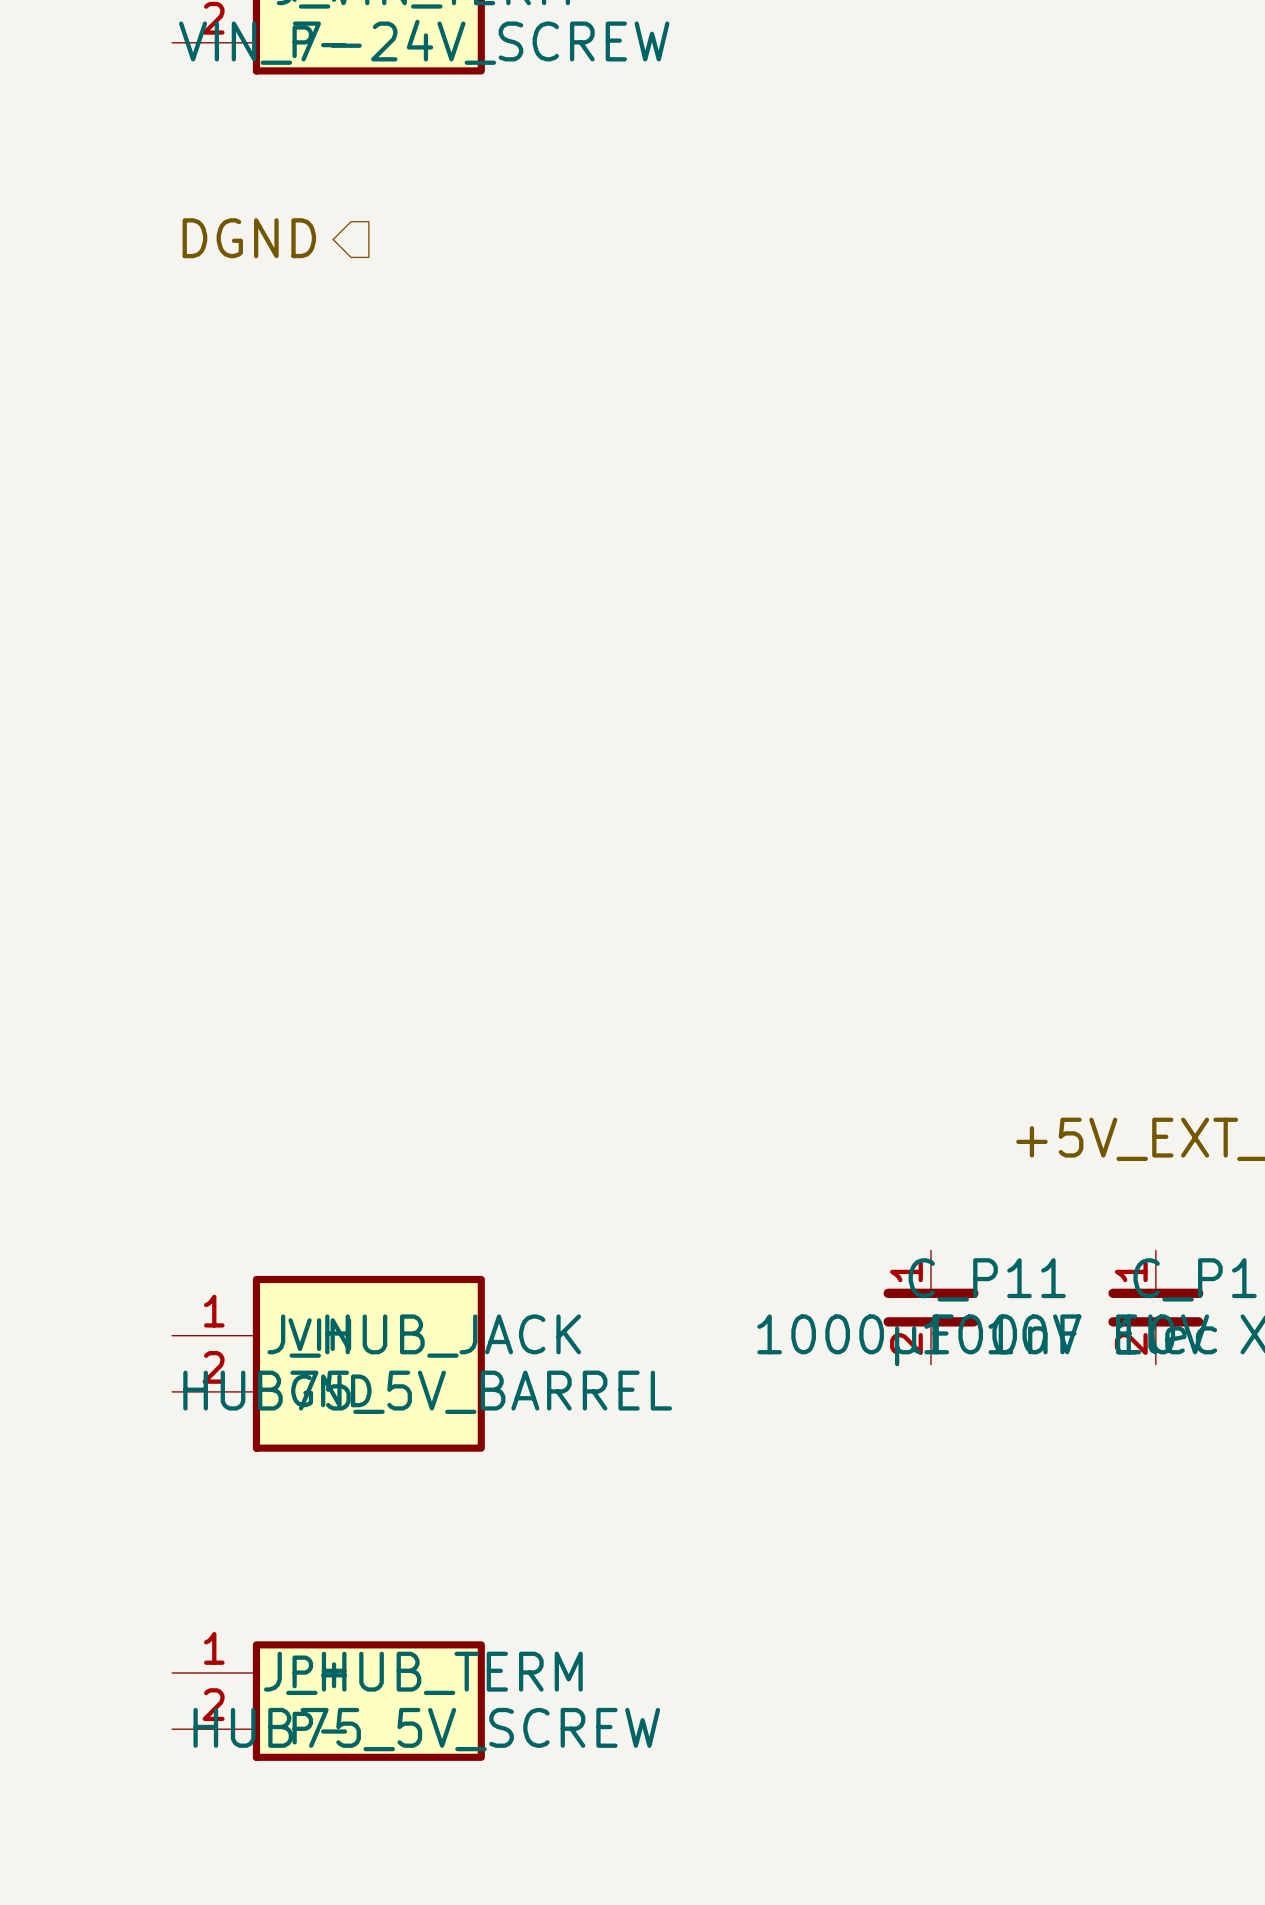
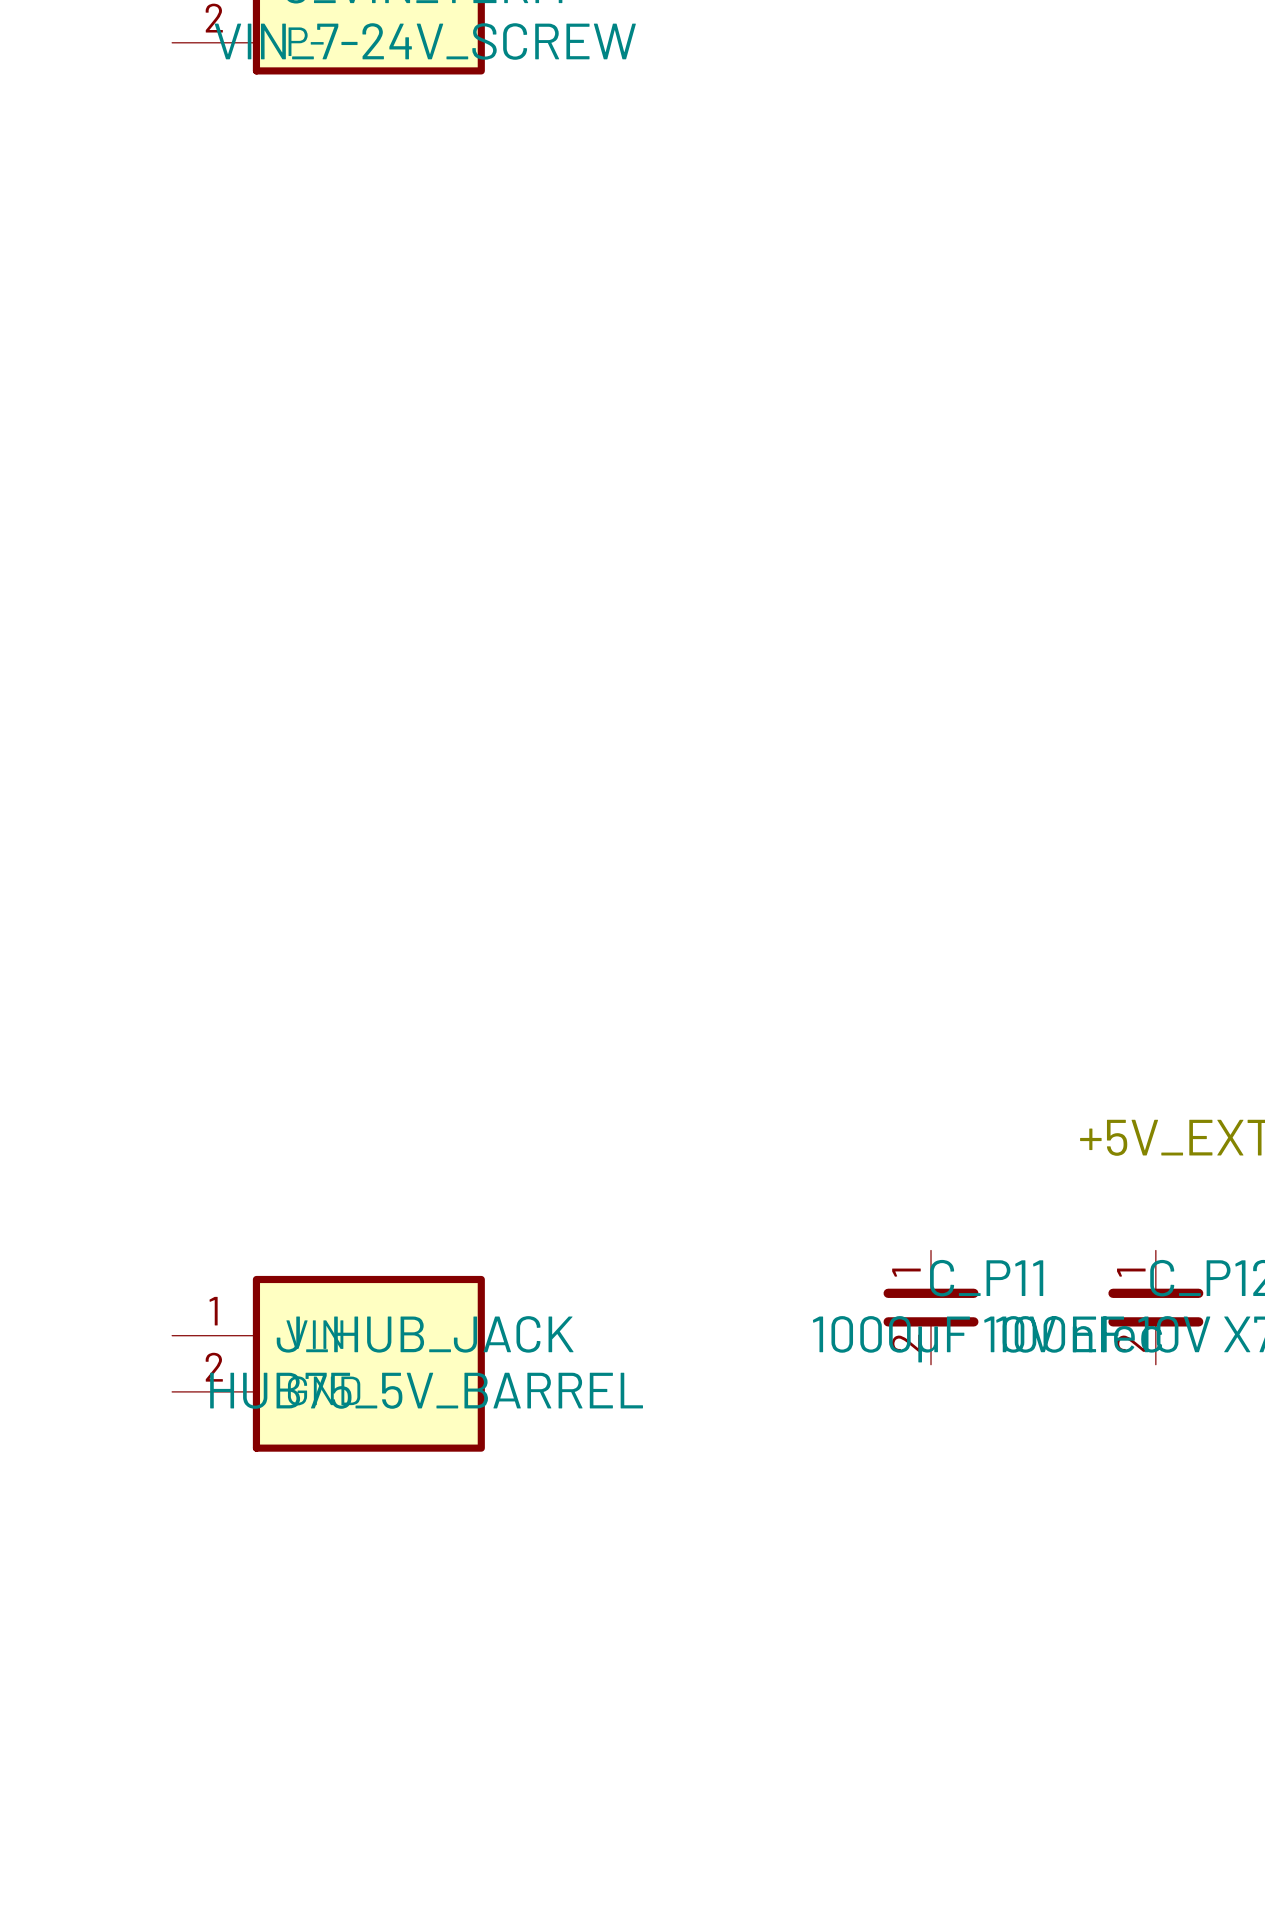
hierarchical label: DGND (249, 238) -> none
J_HUB_TERM: HUB75_5V_SCREW (328, 1701) -> none

